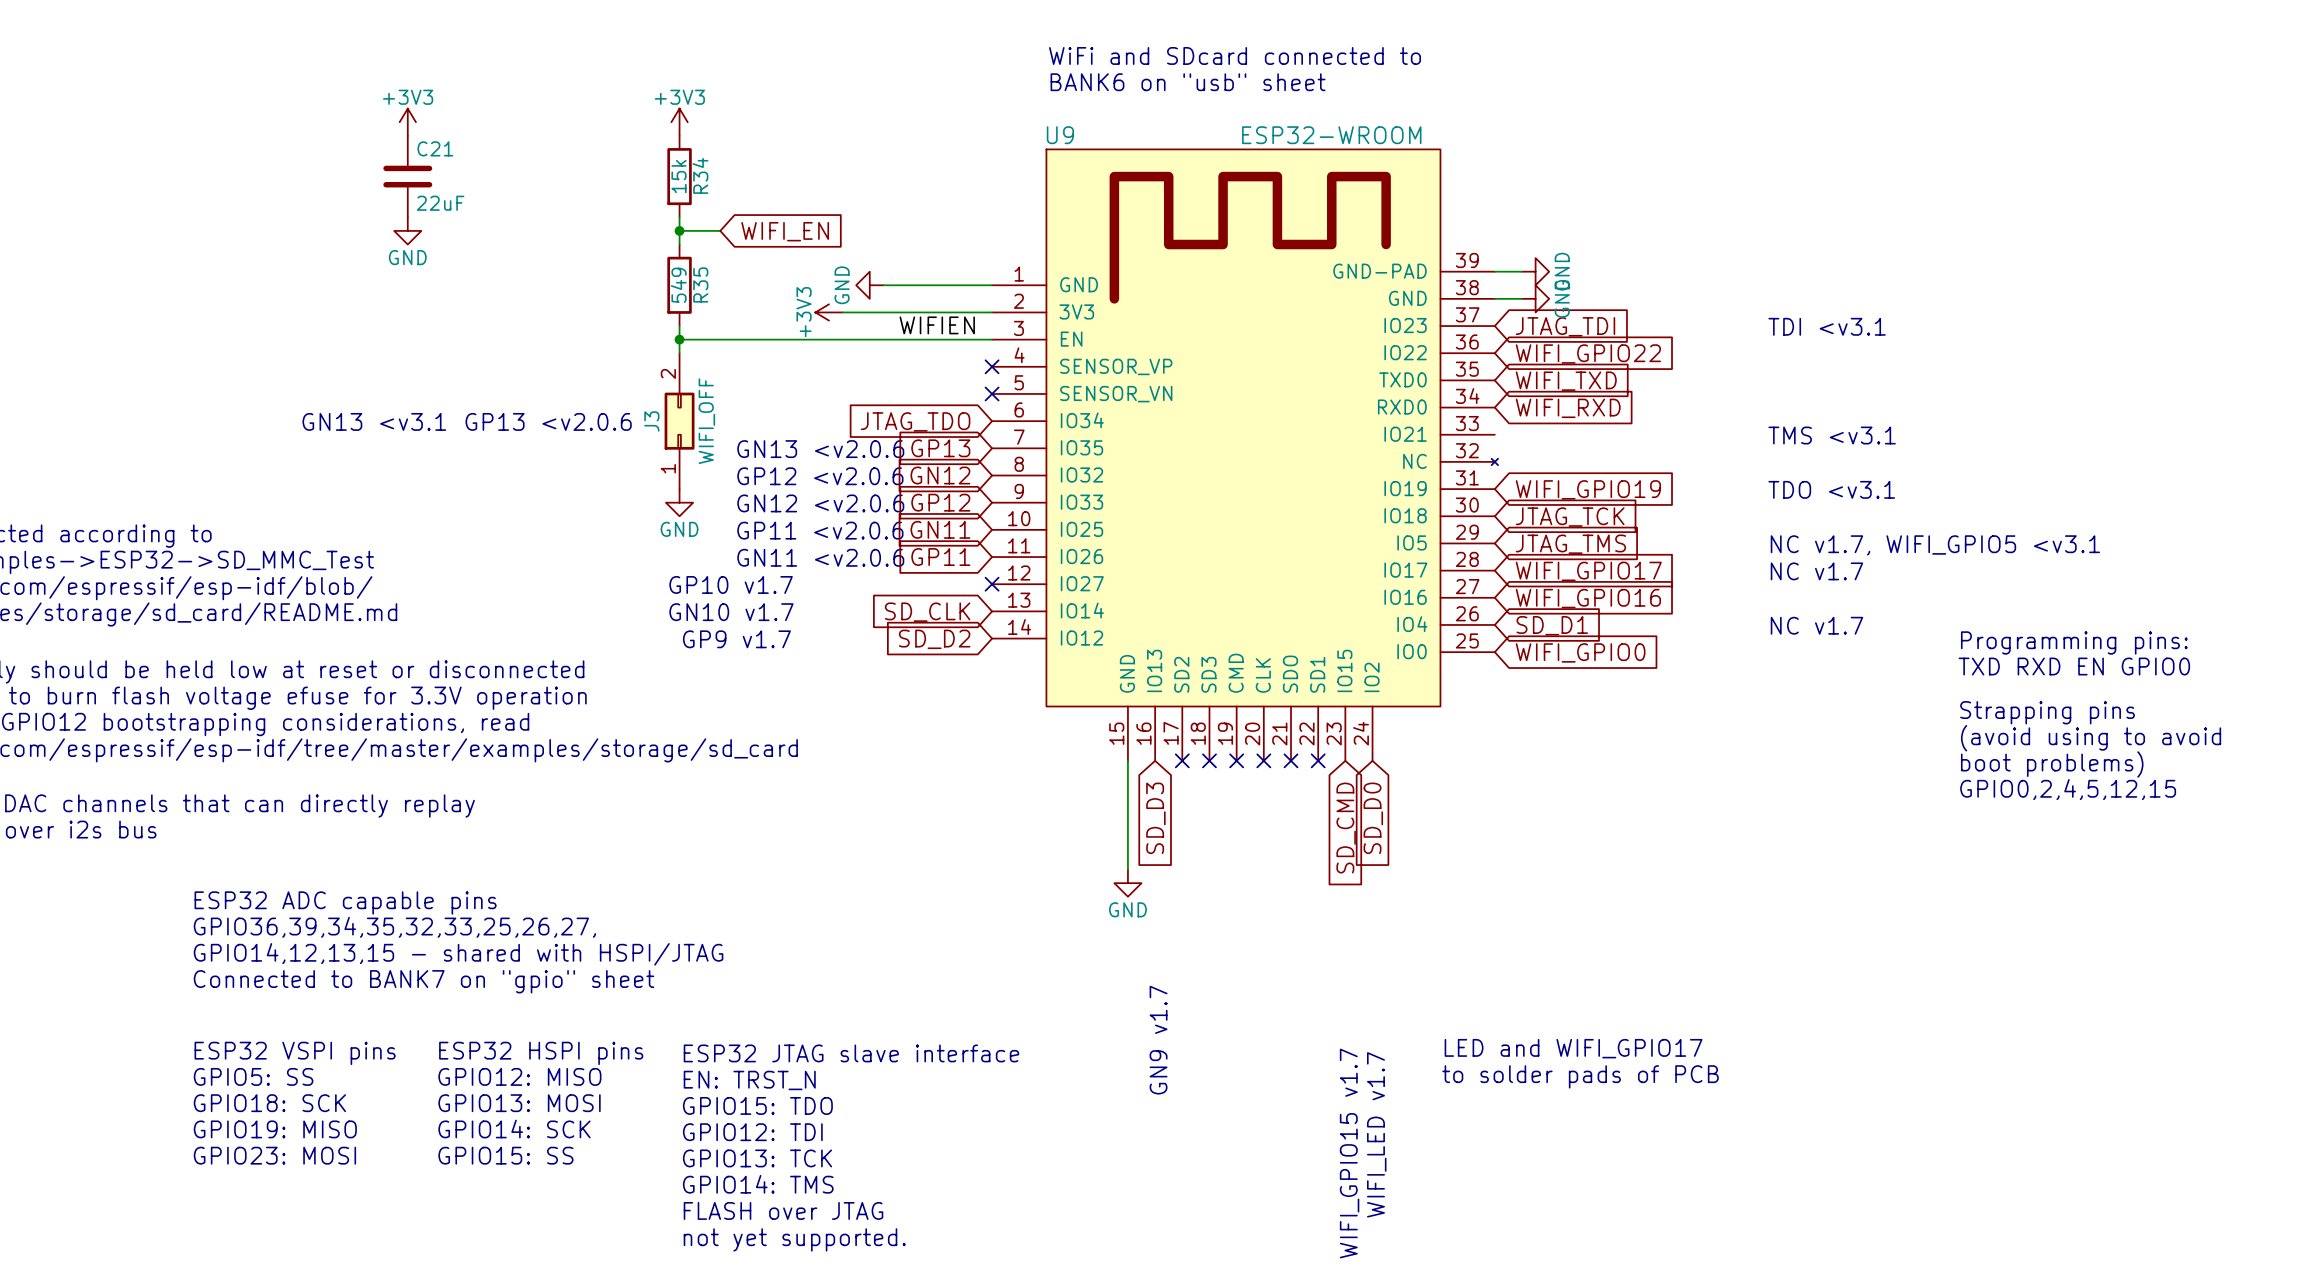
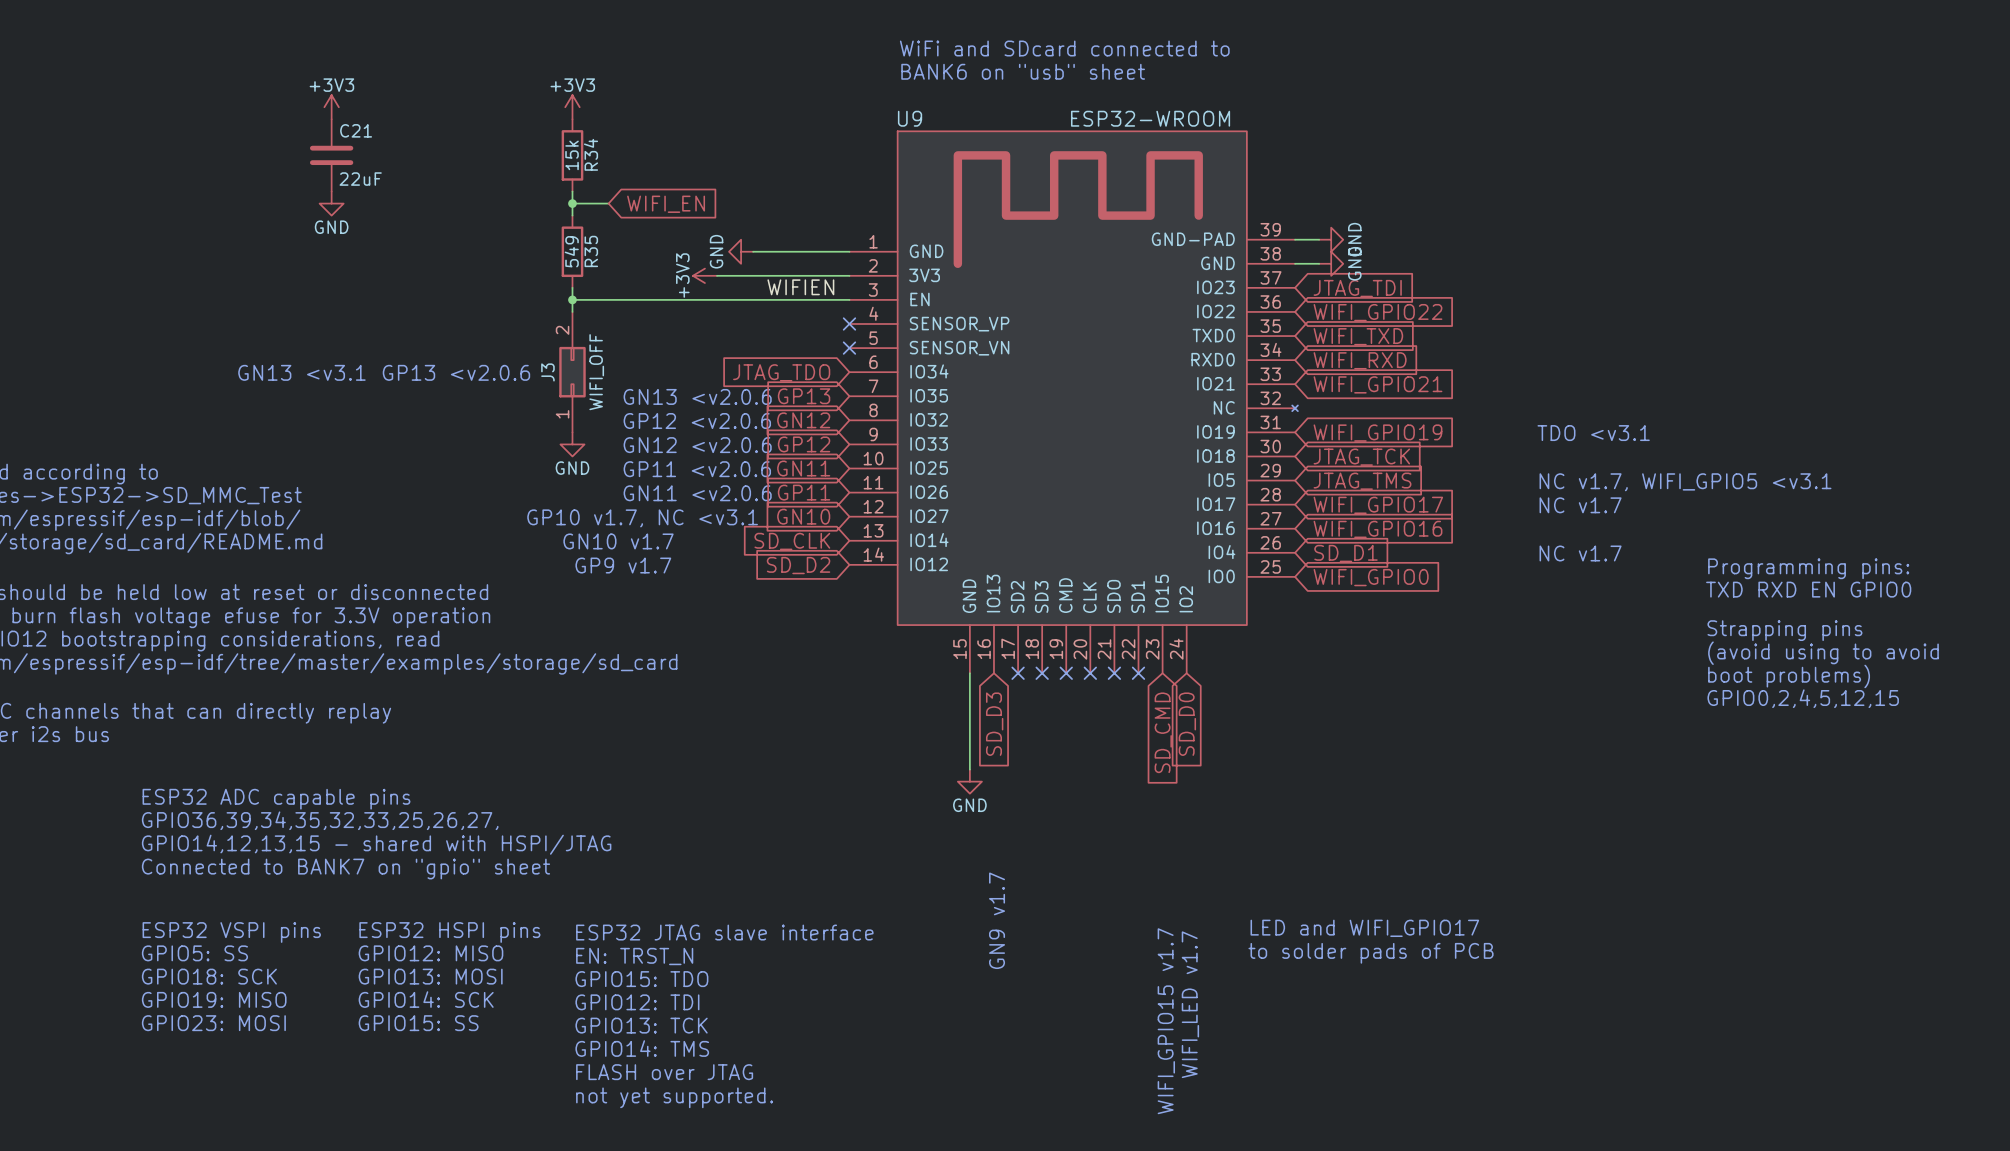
text: TDI <v3.1 (1827, 326) -> none
global label: none -> WIFI_GPIO21 (1377, 384)
text: TMS <v3.1 (1832, 435) -> none
text: GP10 v1.7 (731, 584) -> GP10 v1.7, NC <v3.1 (642, 518)
global label: none -> GN10 (803, 516)
no-connect mark: (992, 584) -> none

